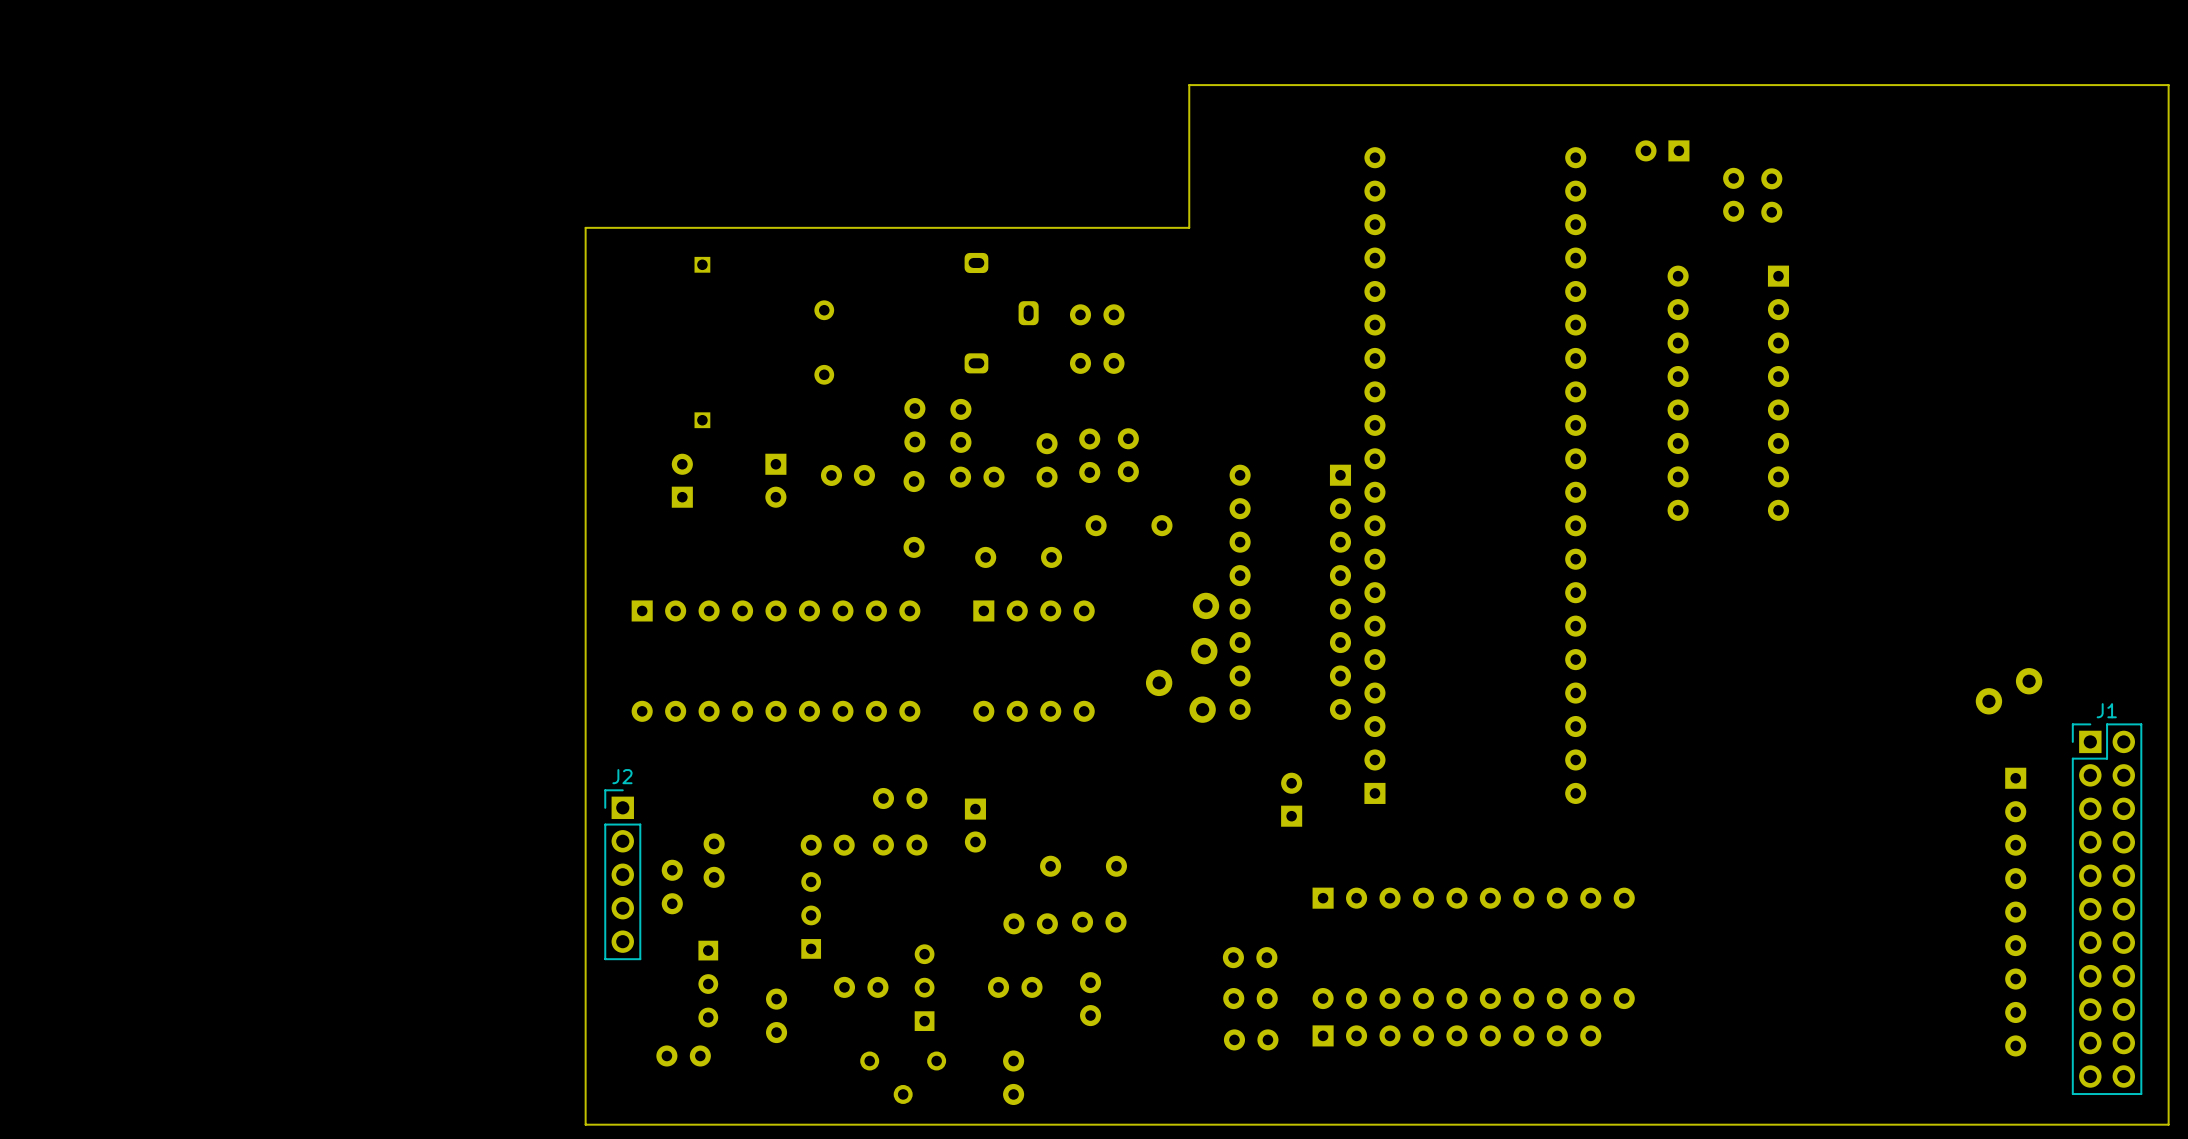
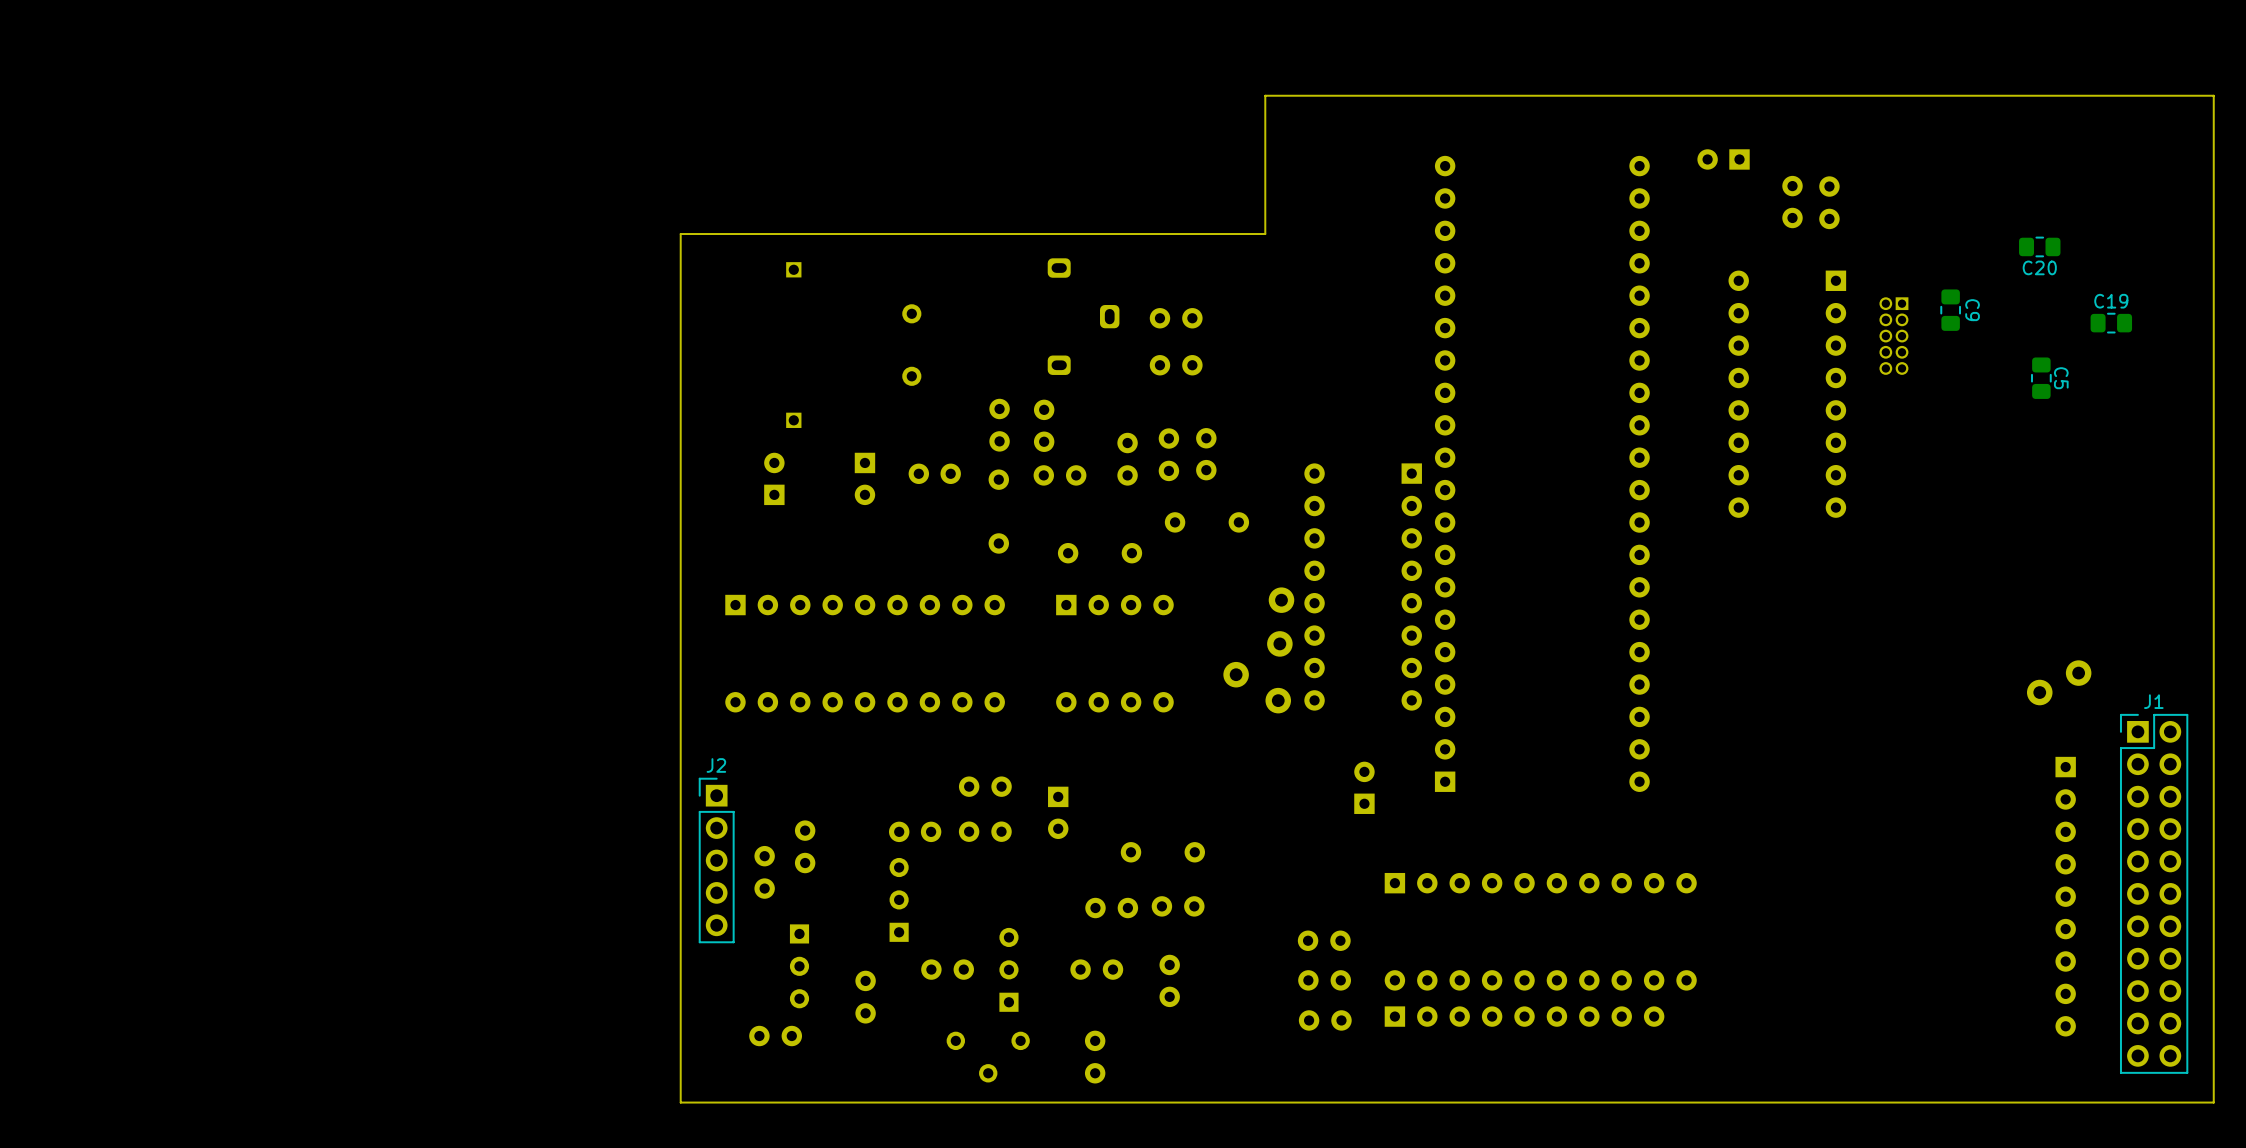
C20: none -> (2039, 246)
C9: none -> (1950, 310)
C19: none -> (2111, 323)
part: none -> (1893, 336)
C5: none -> (2041, 378)

